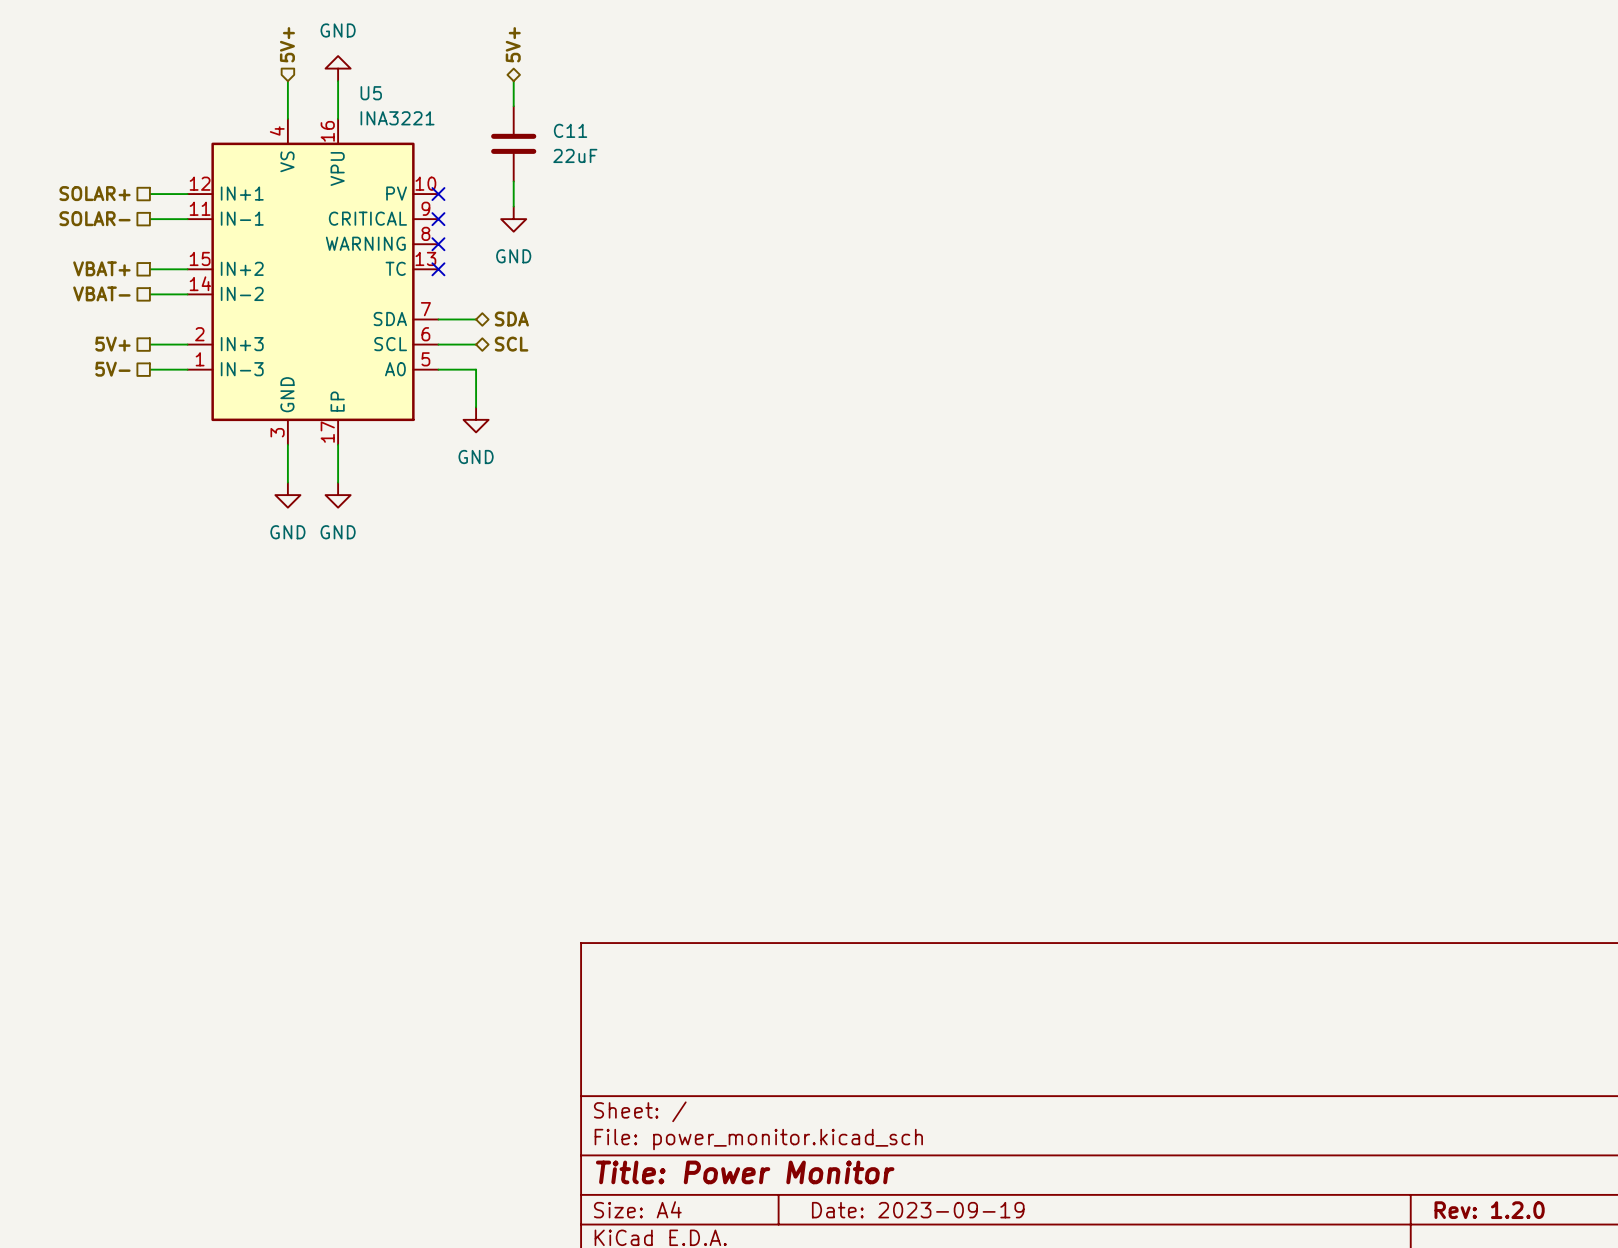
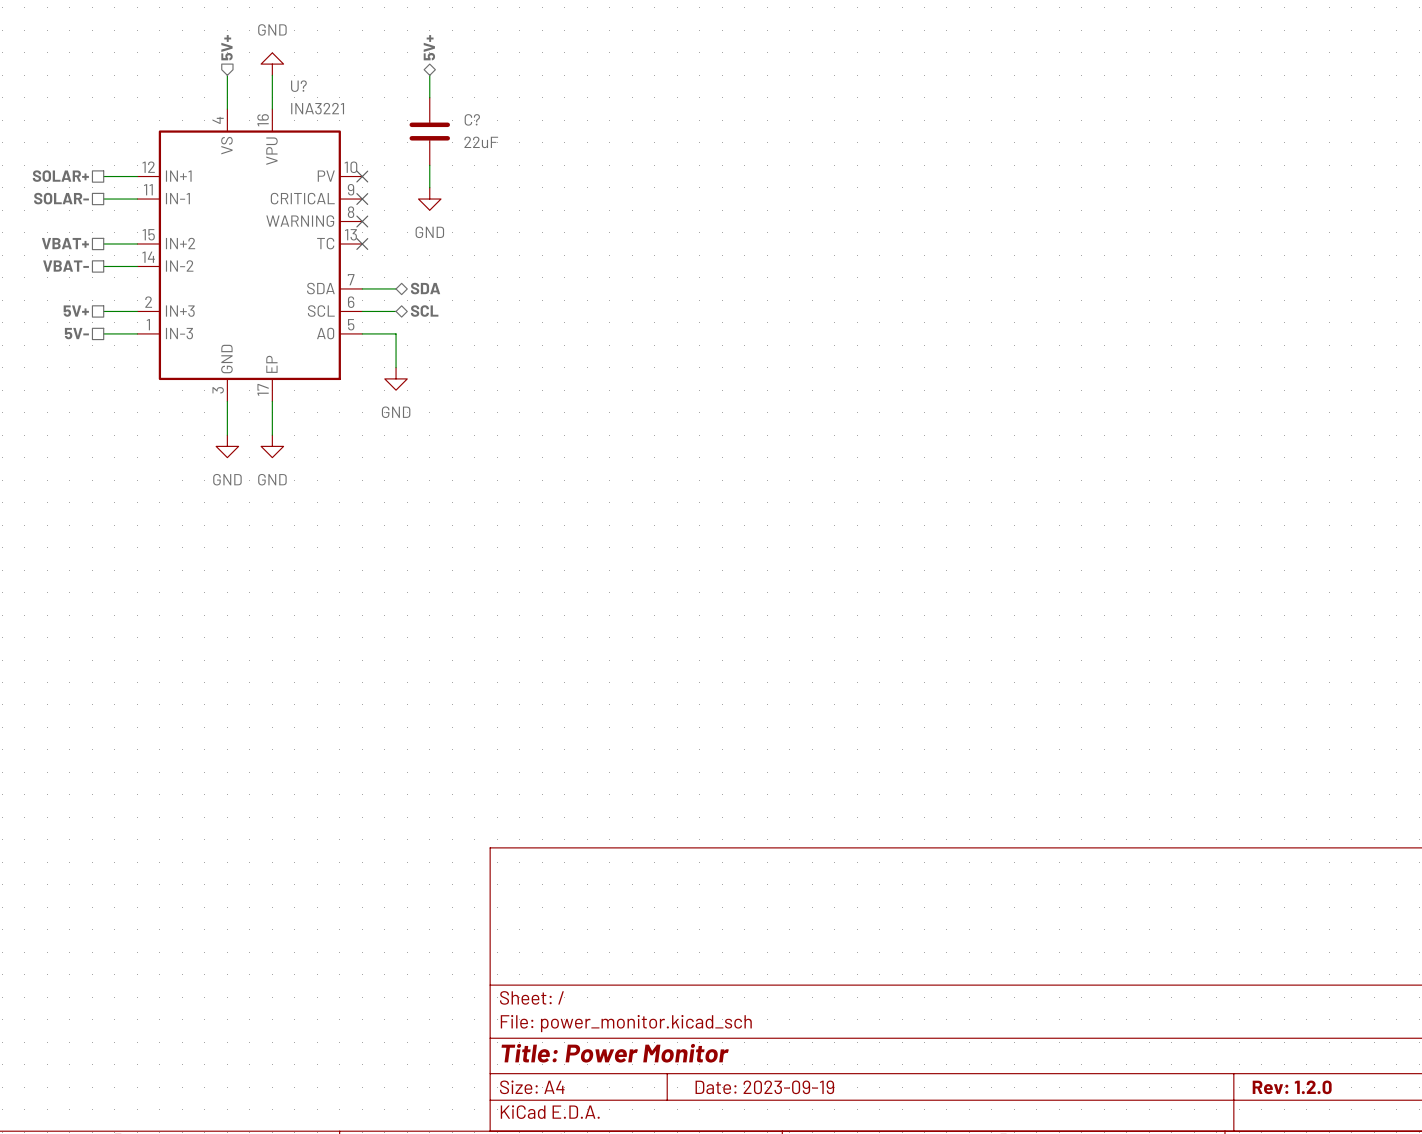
U5 name: U5 (371, 93) -> U? (298, 86)
C11 name: C11 (570, 130) -> C? (472, 119)

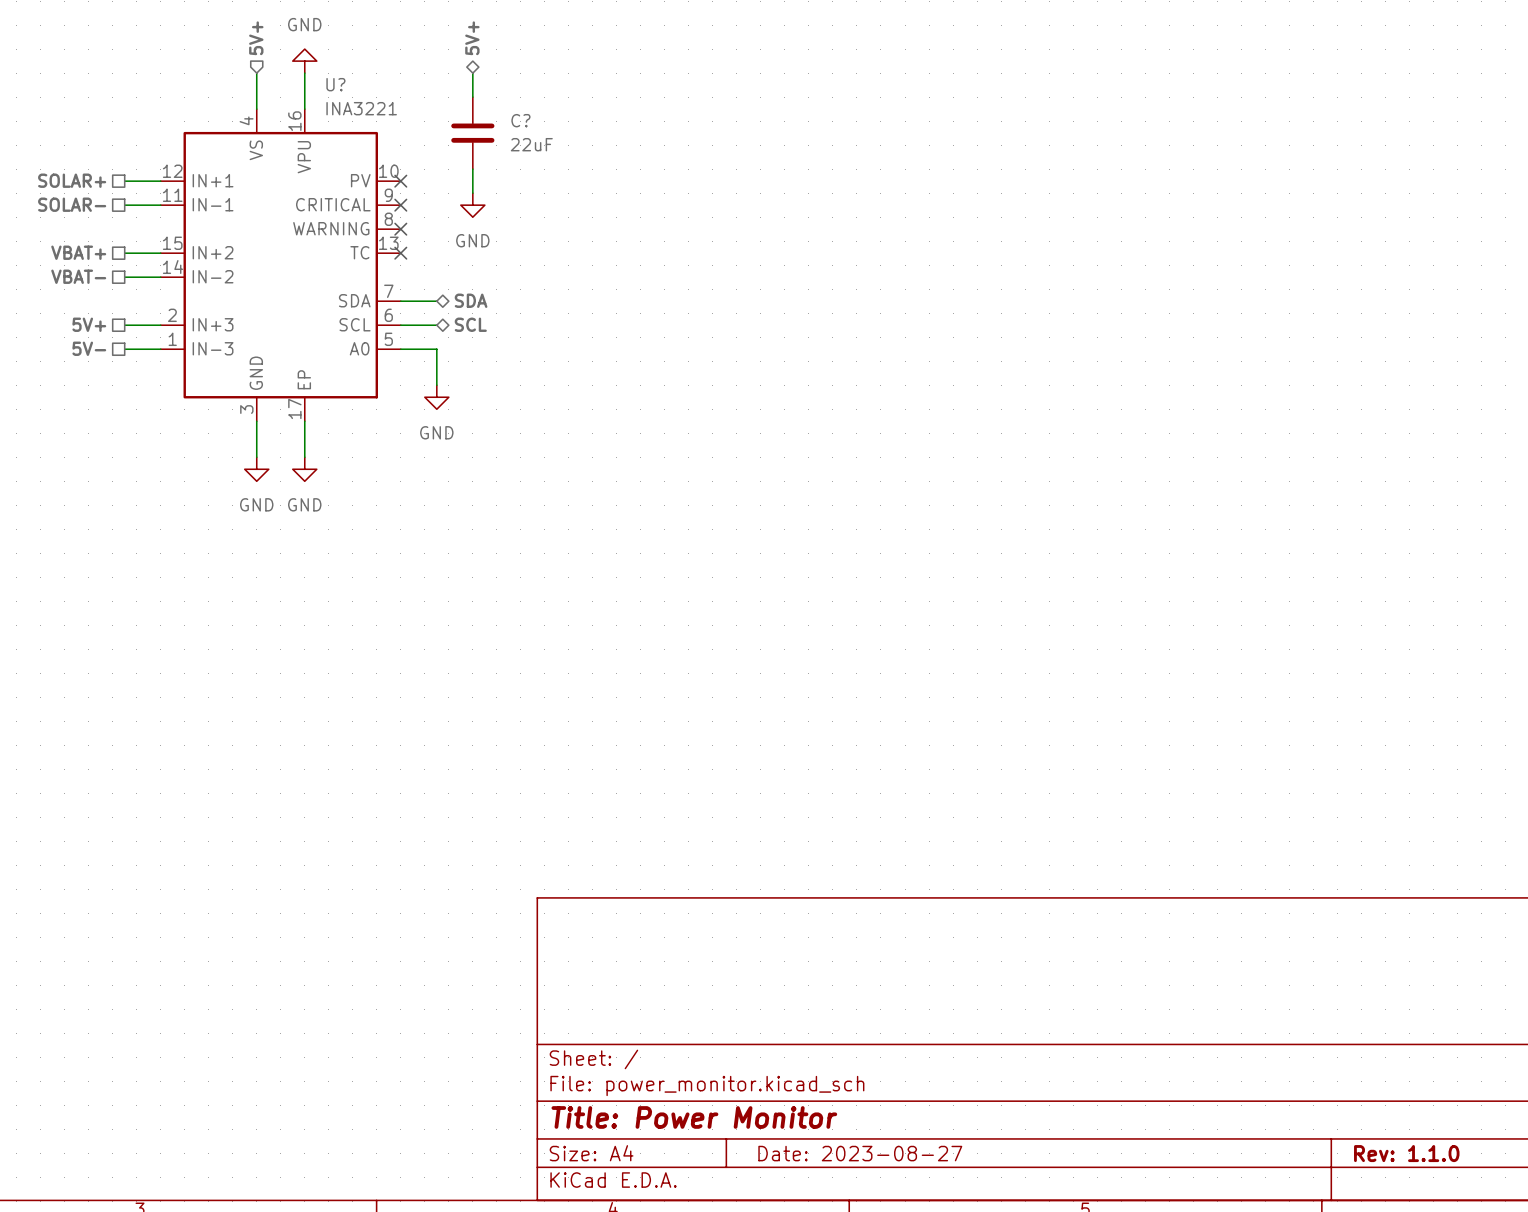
title block: Date: 2023-09-19 (764, 1087) -> Date: 2023-08-27 (860, 1153)
title block: Rev: 1.2.0 (1292, 1087) -> Rev: 1.1.0 (1406, 1153)

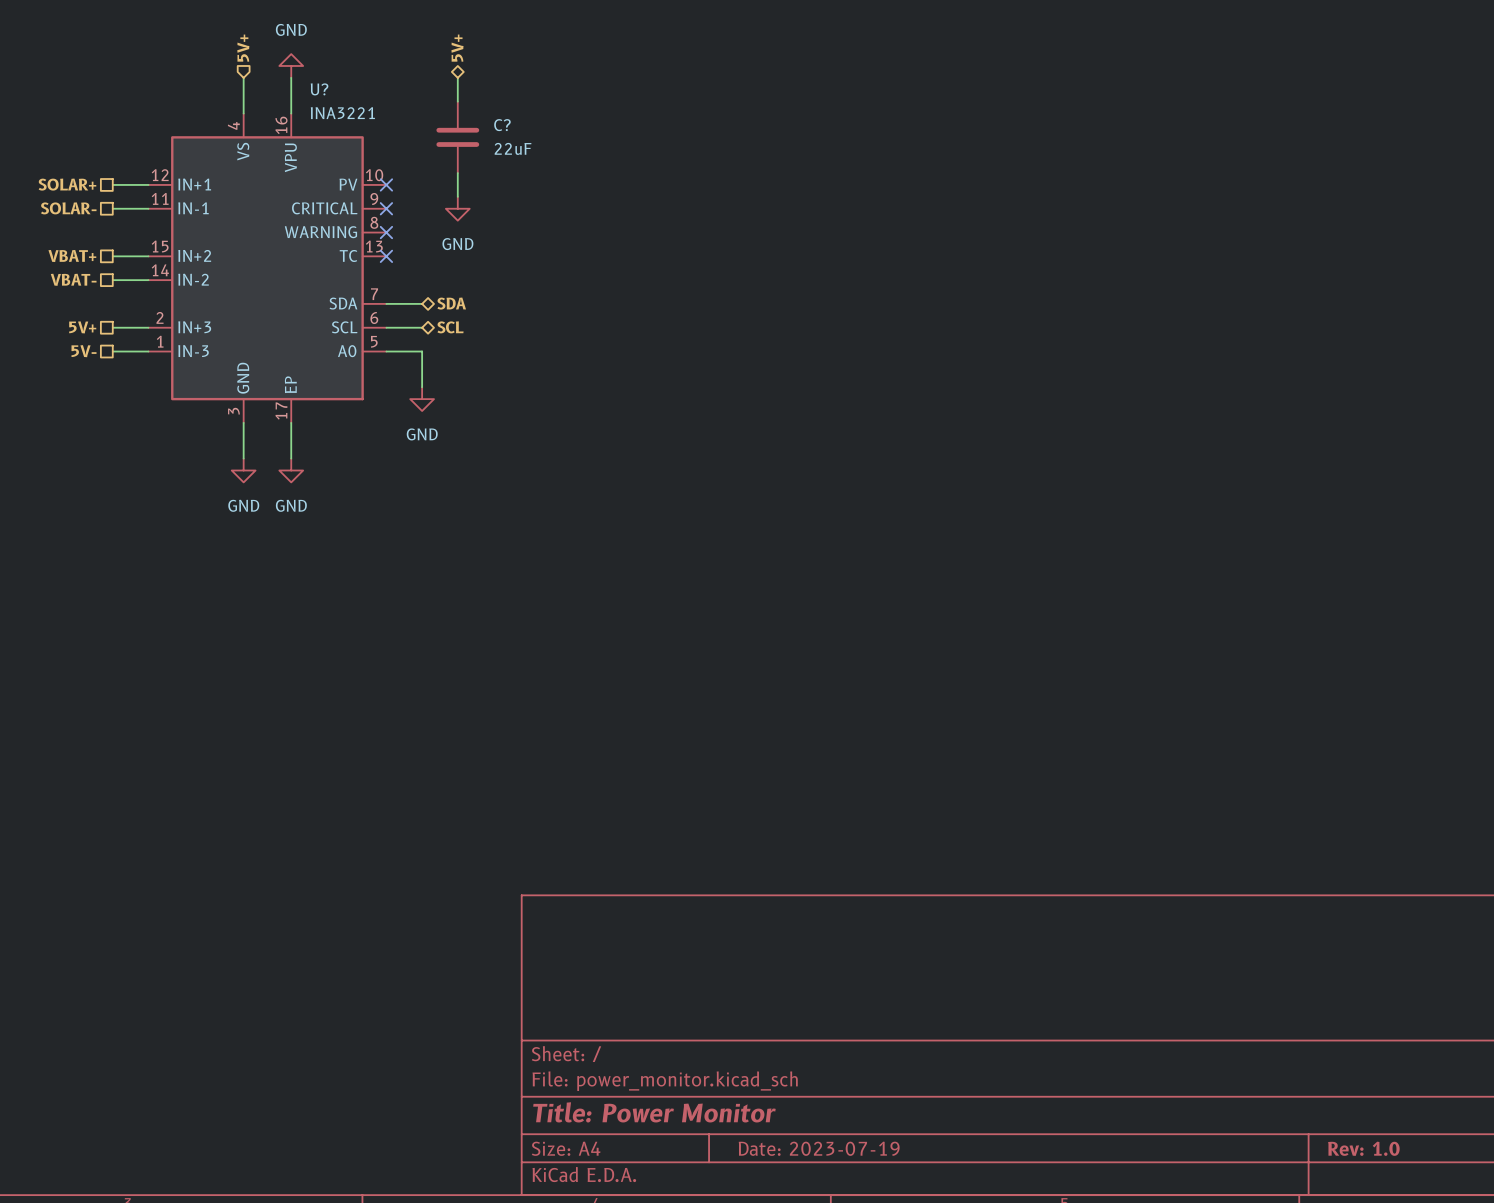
title block: Date: 2023-08-27 (860, 1153) -> Date: 2023-07-19 (819, 1148)
title block: Rev: 1.1.0 (1406, 1153) -> Rev: 1.0 (1363, 1148)

